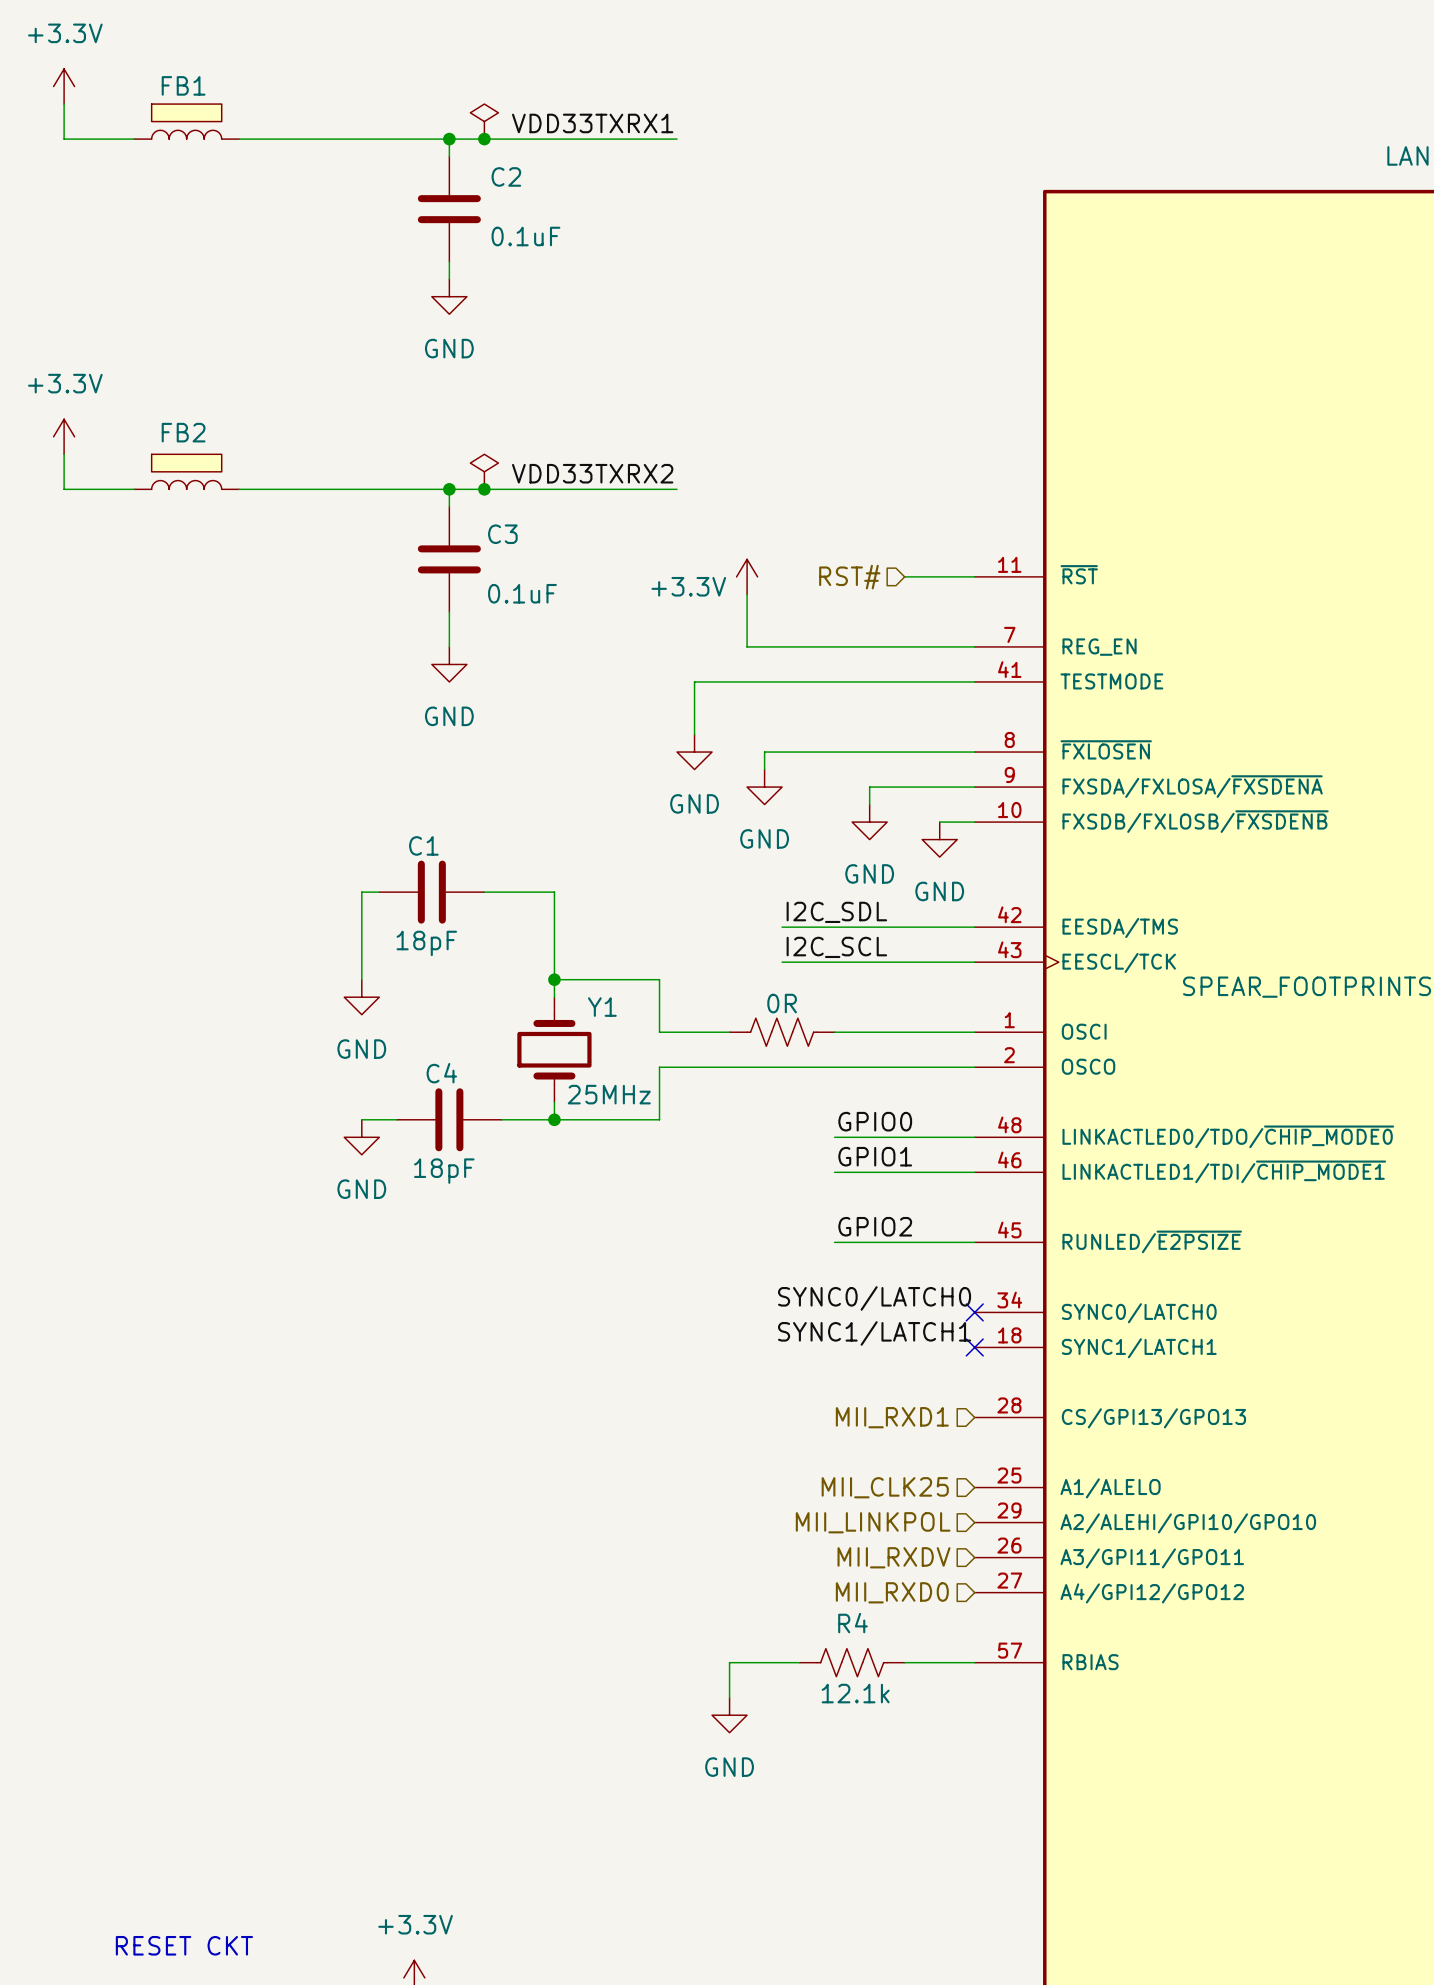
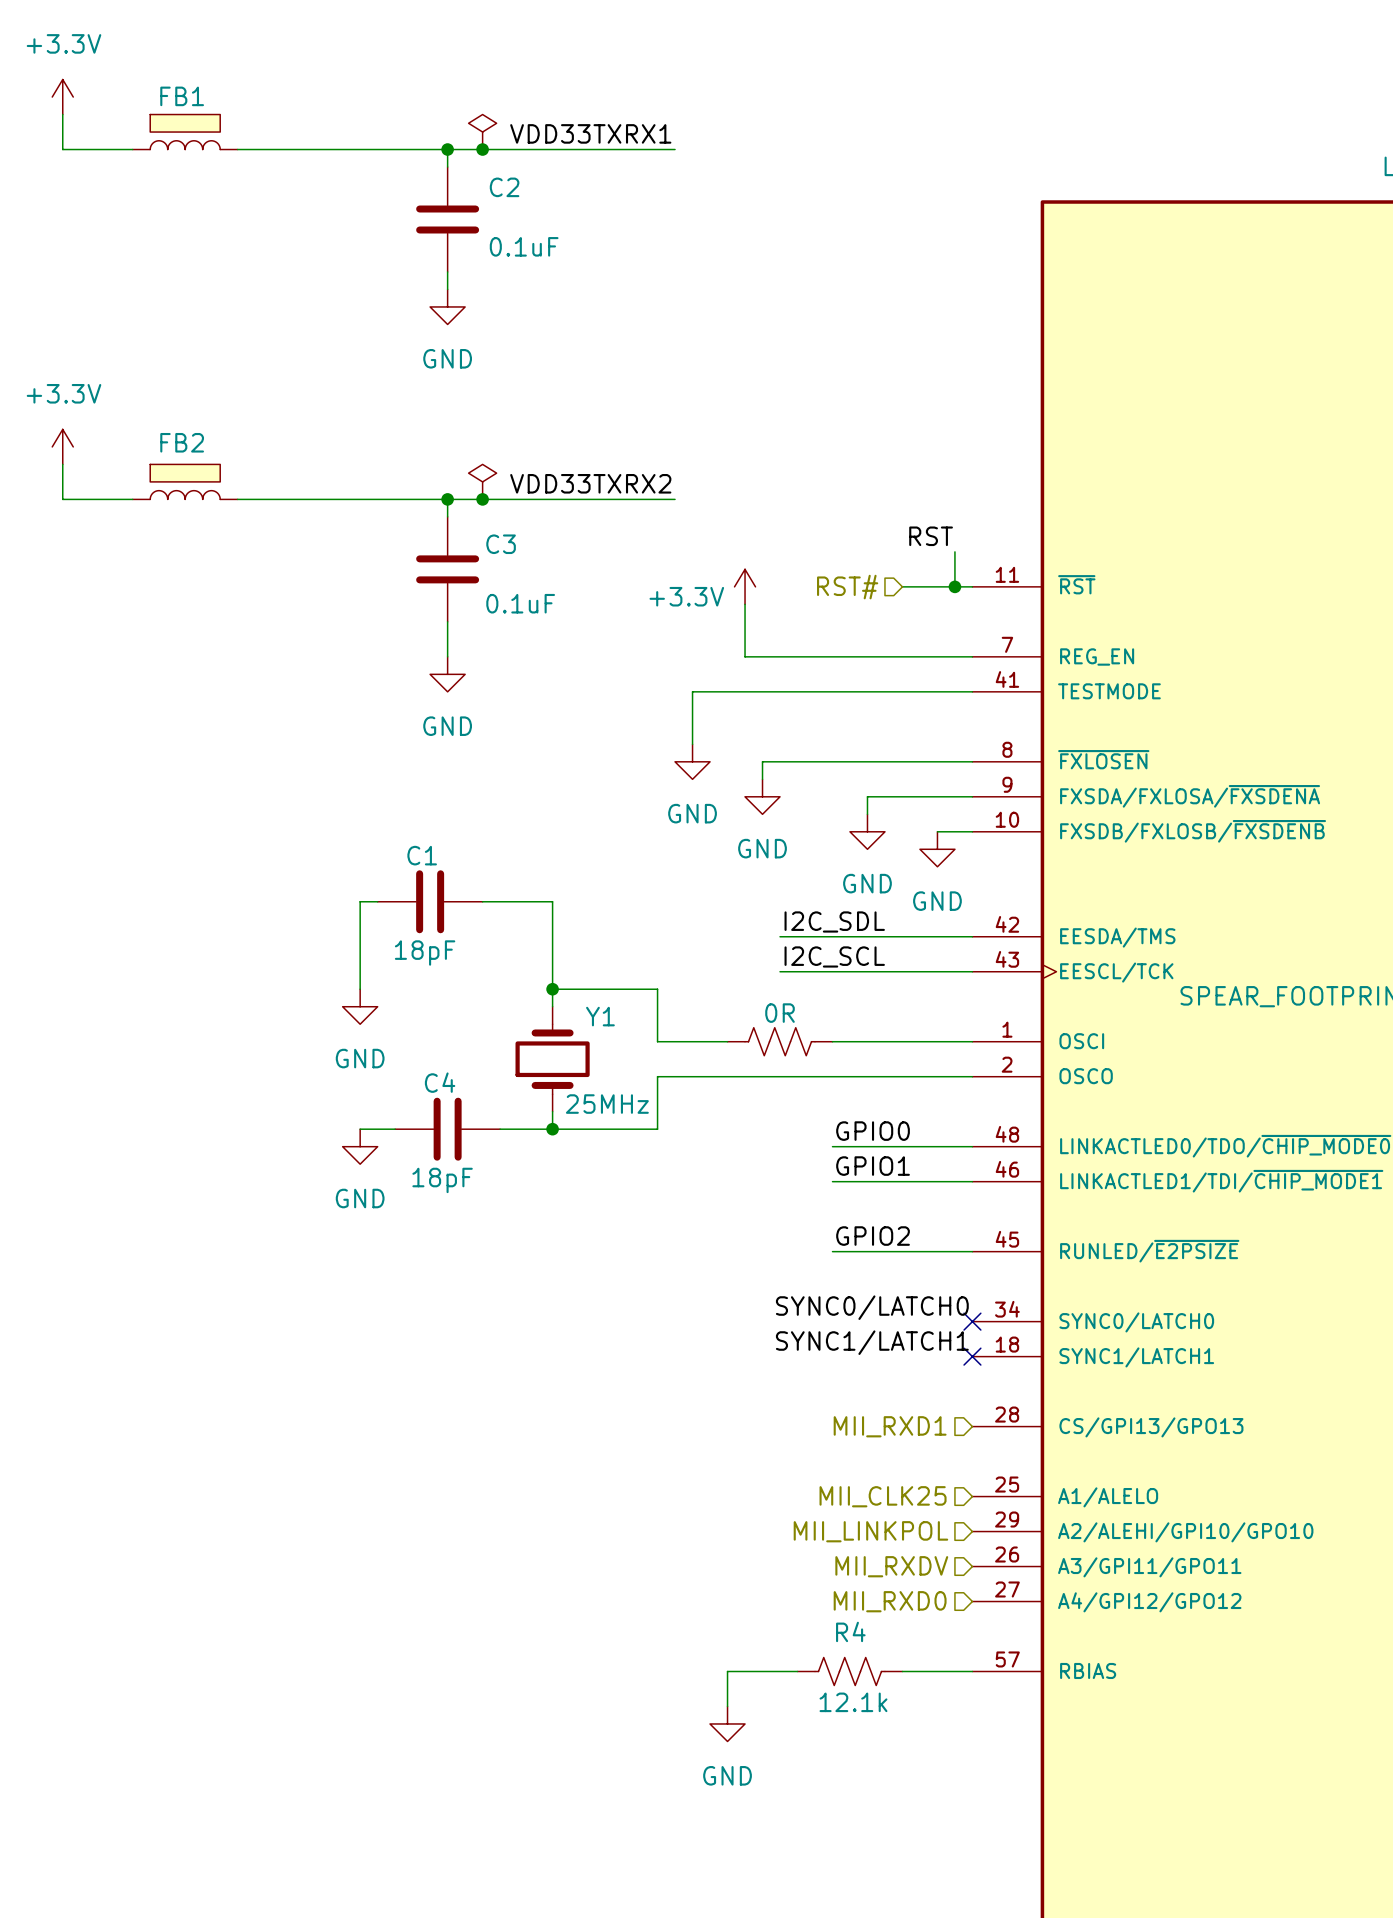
label: none -> RST (931, 536)
wire: none -> (954, 551) (954, 586)
junction: none -> (954, 586)

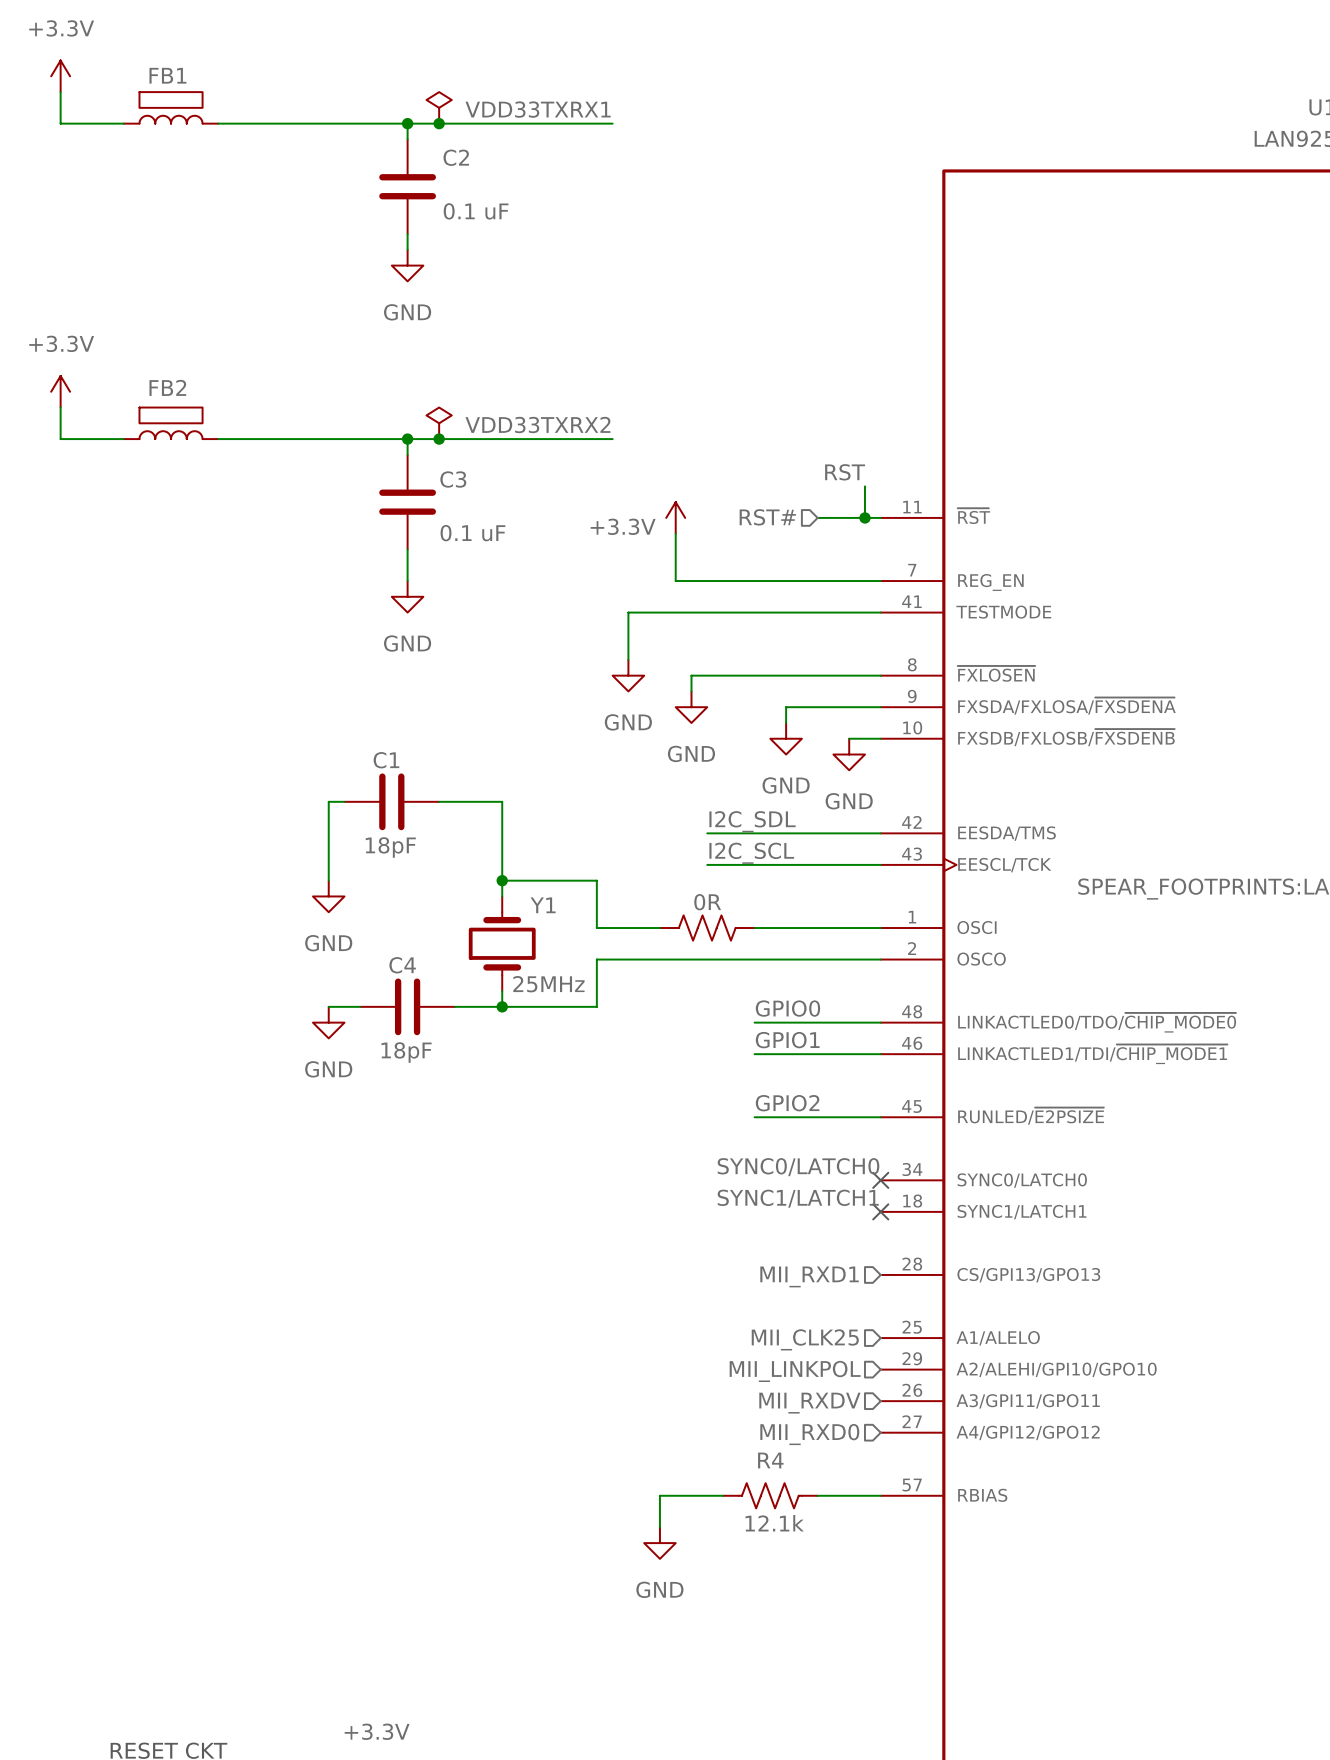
C2 value: 0.1uF (524, 246) -> 0.1 uF (476, 211)
C3 value: 0.1uF (520, 603) -> 0.1 uF (472, 533)

